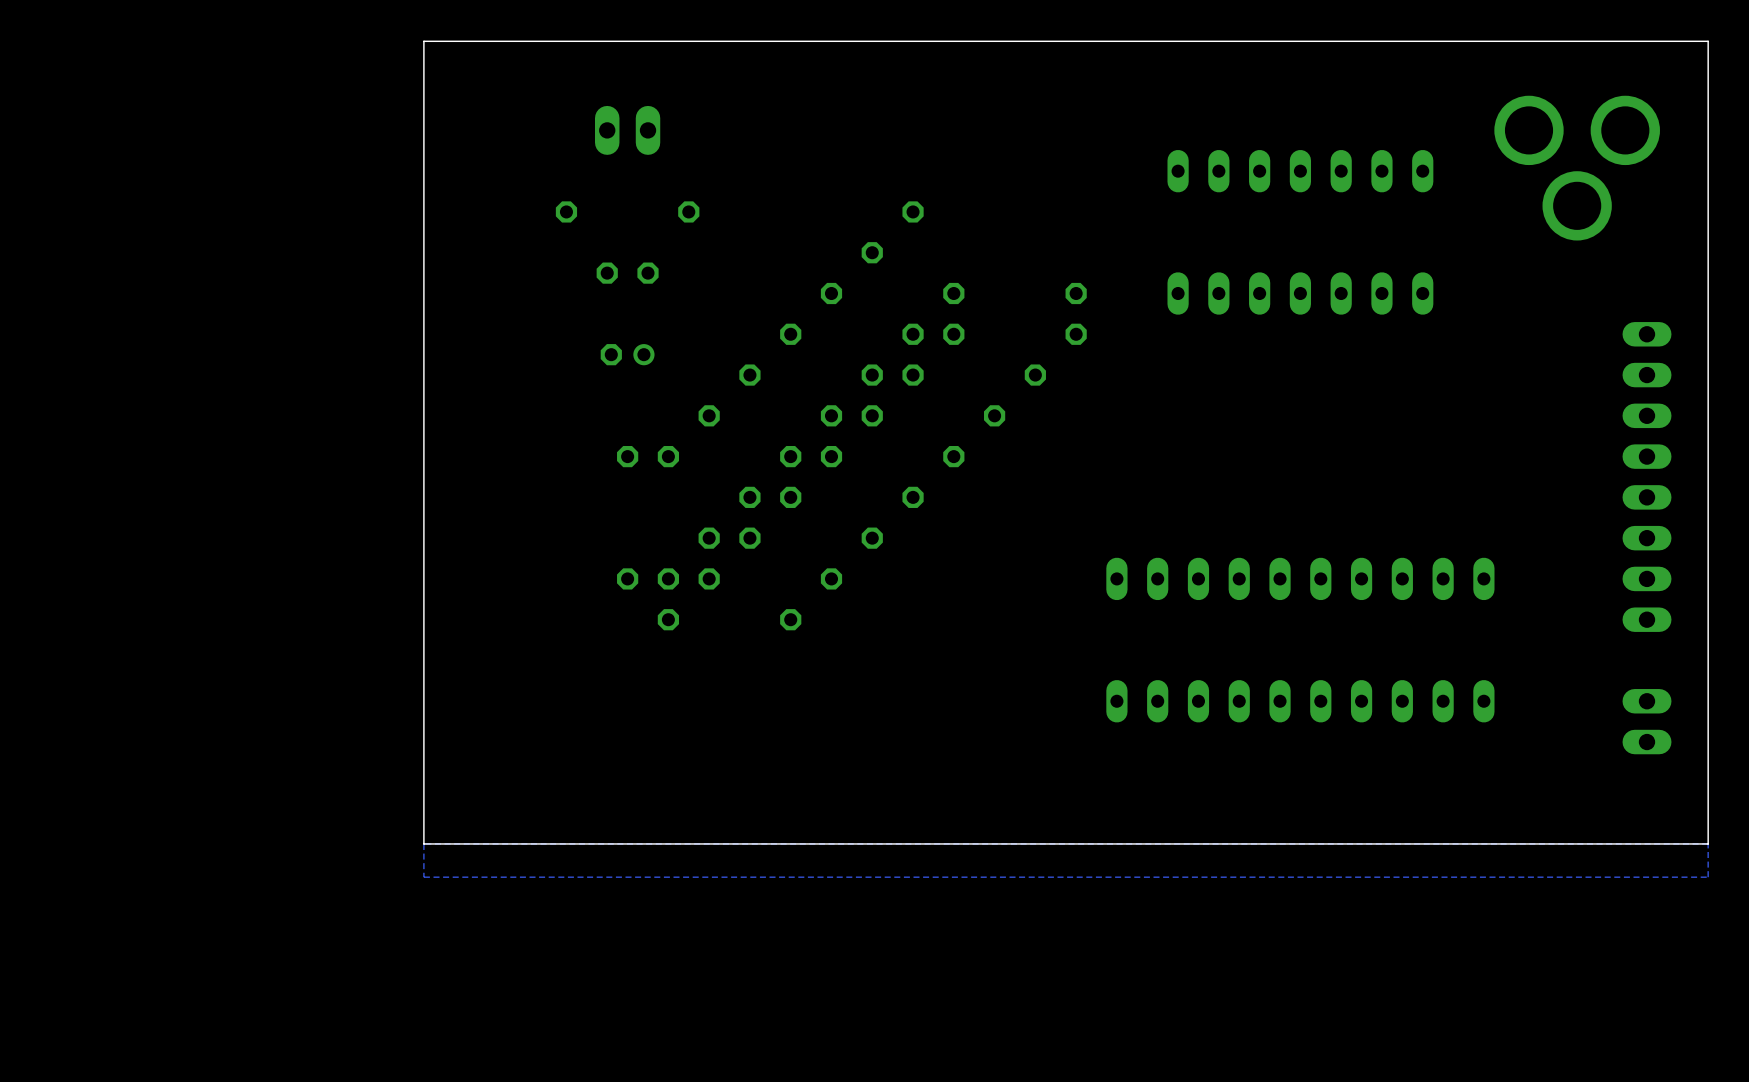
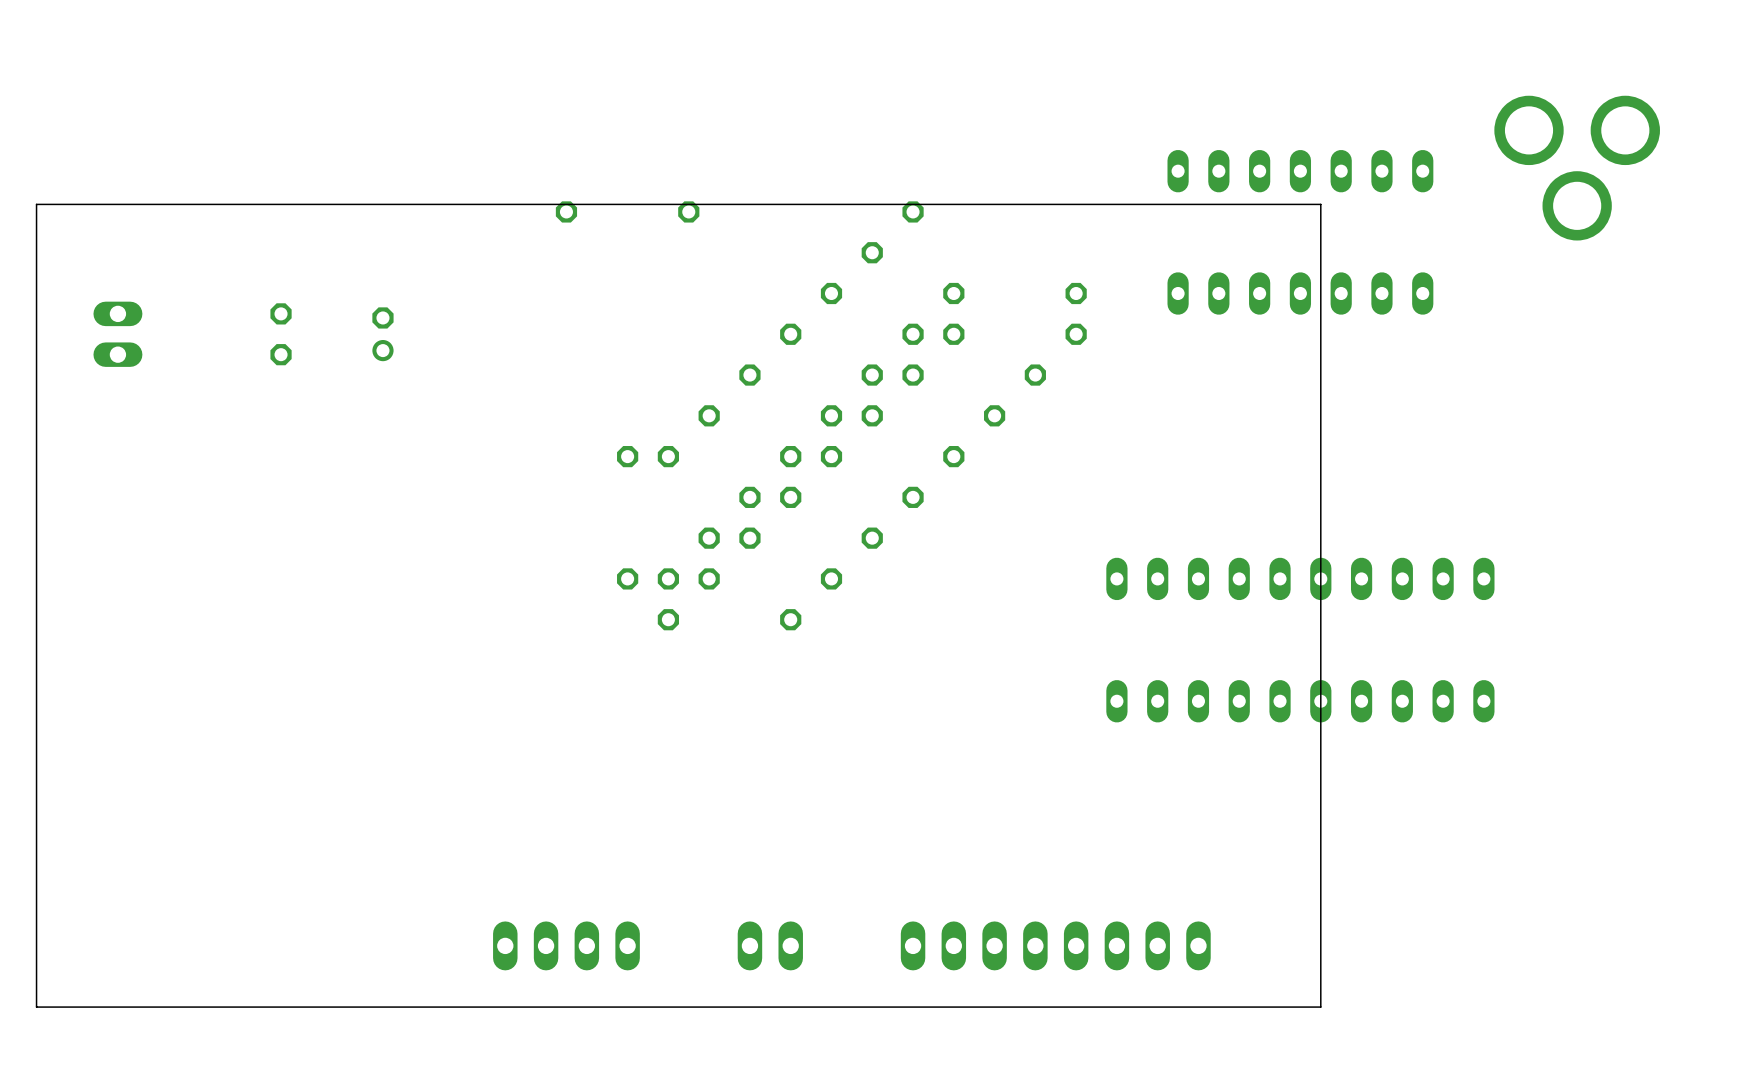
board edge: (1708, 41) (423, 41) (423, 843) (1708, 843) (1708, 41) -> none
part: (627, 130) -> none
board edge: none -> (1320, 204) (36, 204) (36, 1007) (1320, 1007) (1320, 204)
part rotation: 0° (627, 273) -> 90° clockwise (281, 334)
part position: (627, 273) -> (281, 334)
part: none -> (117, 334)
part rotation: 0° (627, 354) -> 90° clockwise (382, 334)
part position: (627, 354) -> (382, 334)
part: (1647, 476) -> none
part: (1647, 721) -> none
zone outline: (1708, 843) (423, 843) (423, 877) (1708, 877) (1708, 843) -> none
part: none -> (566, 945)
part: none -> (770, 945)
part: none -> (1055, 945)

